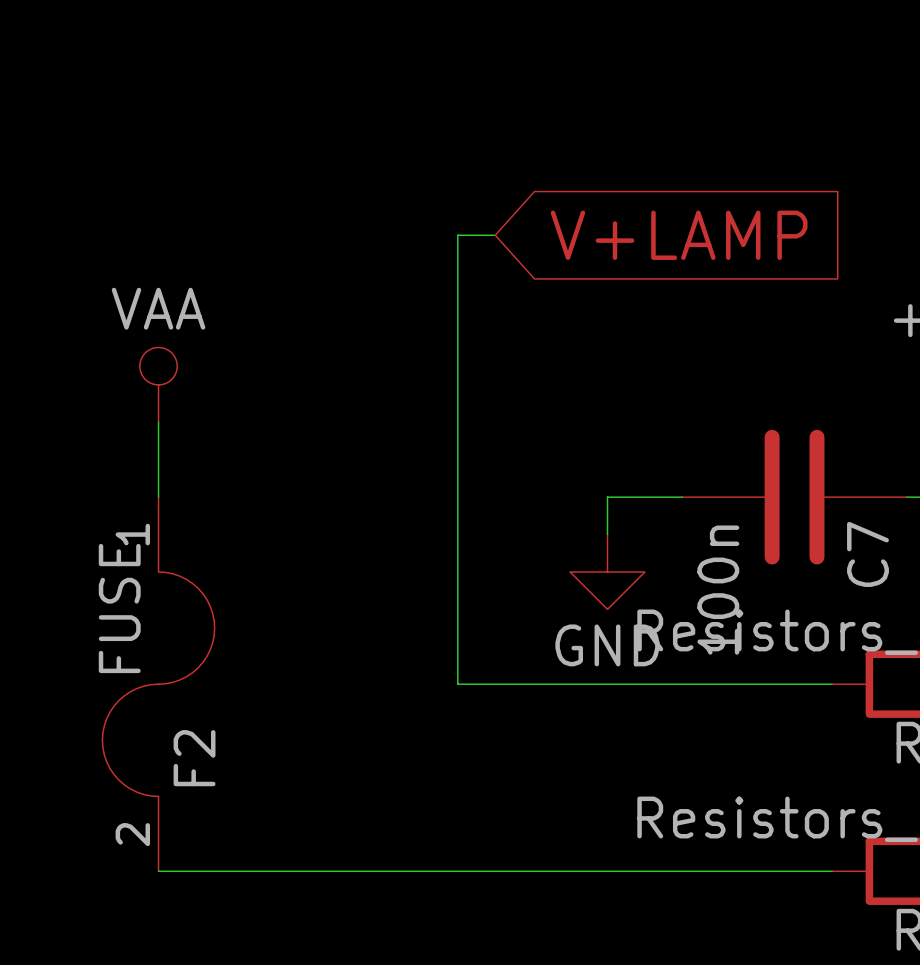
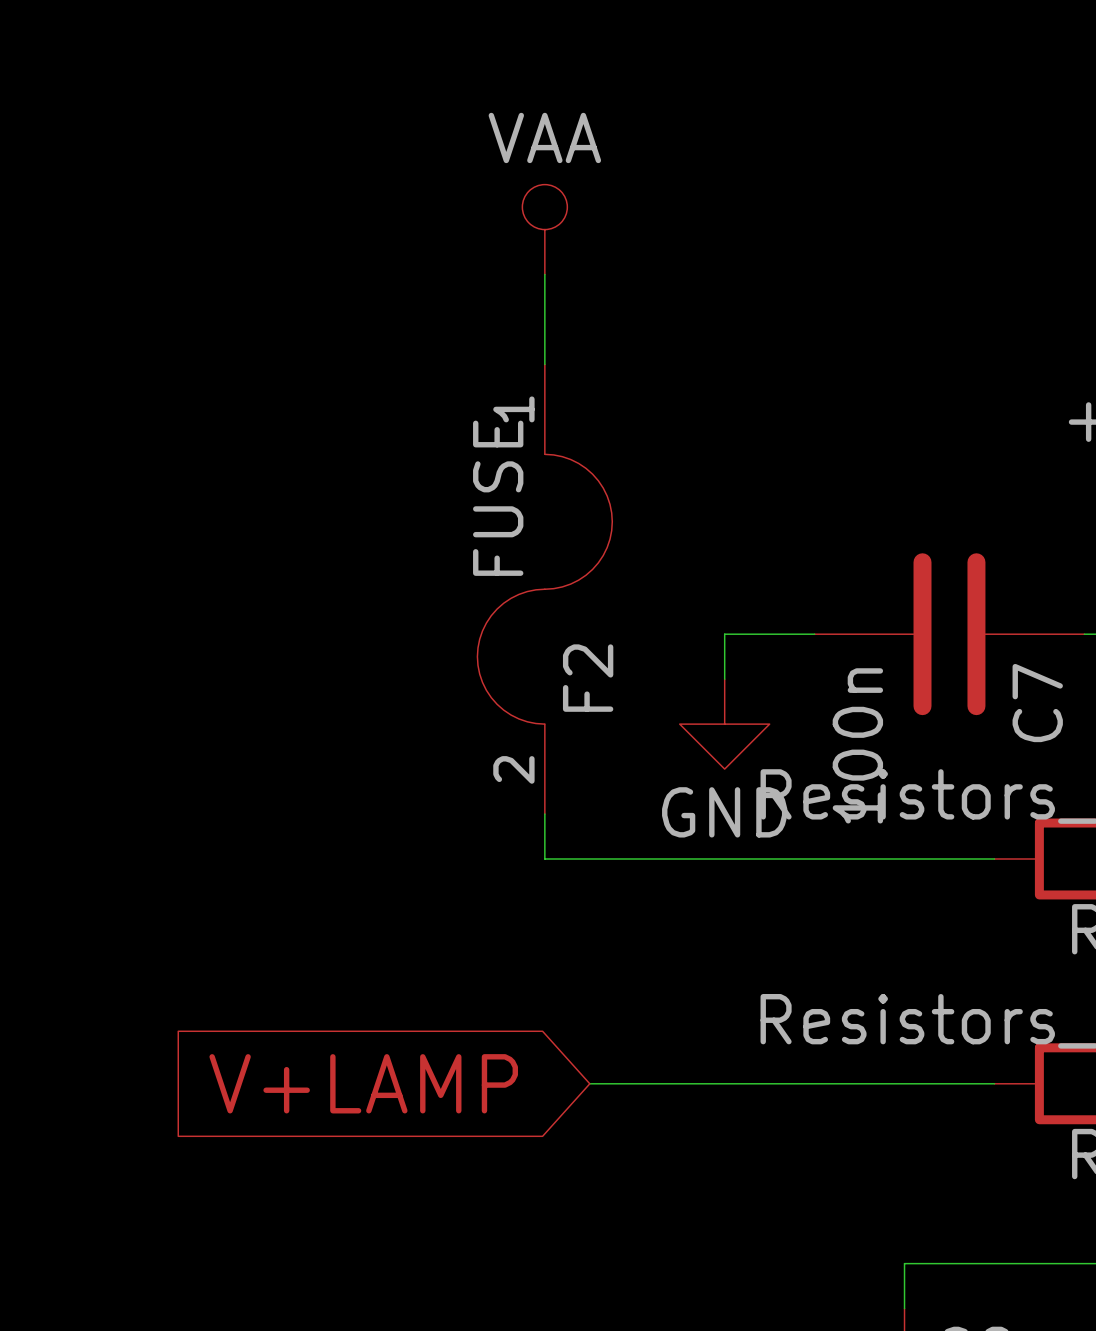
wire: (457, 235) (495, 235) -> (544, 319) (544, 274)
global label rotation: 0° (679, 235) -> 180° (363, 1083)
global label position: V+LAMP (679, 235) -> V+LAMP (363, 1083)
wire: (457, 272) (457, 646) -> none
power symbol position: VAA (158, 384) -> VAA (544, 229)
wire: (158, 422) (158, 497) -> none
F2 position: (158, 684) -> (544, 589)
wire: (158, 871) (495, 871) -> none

